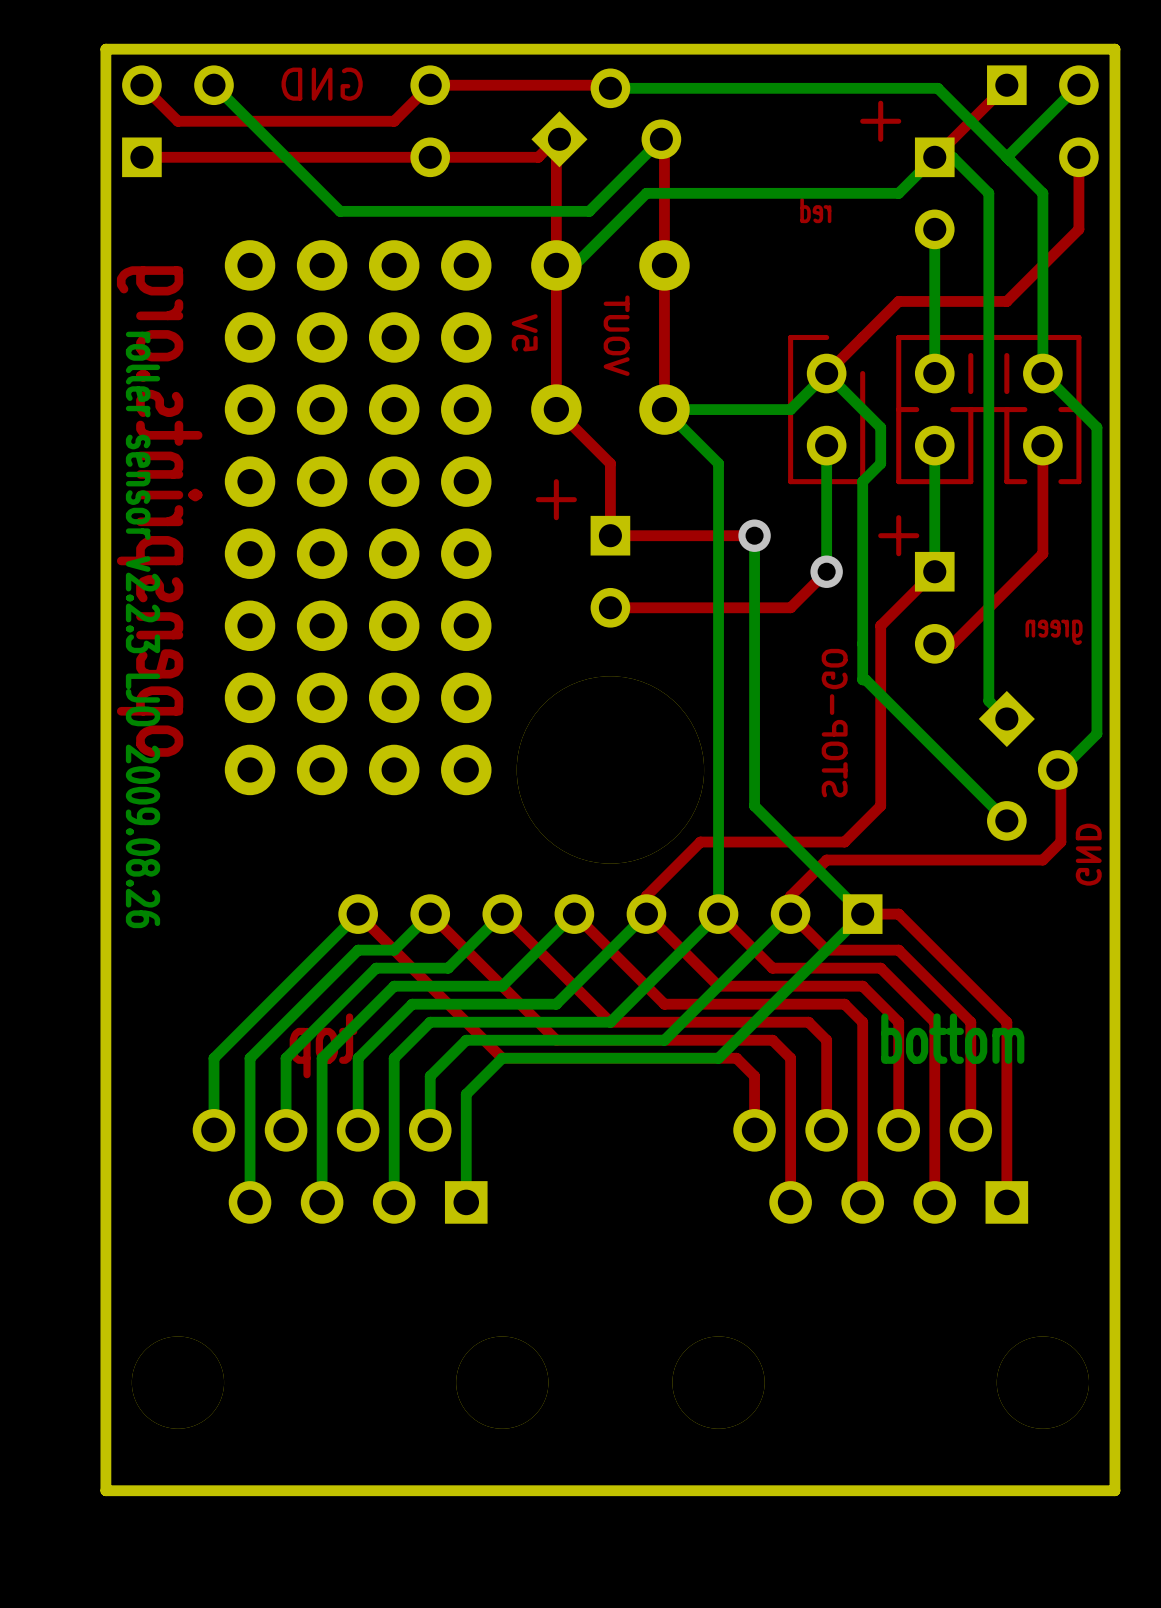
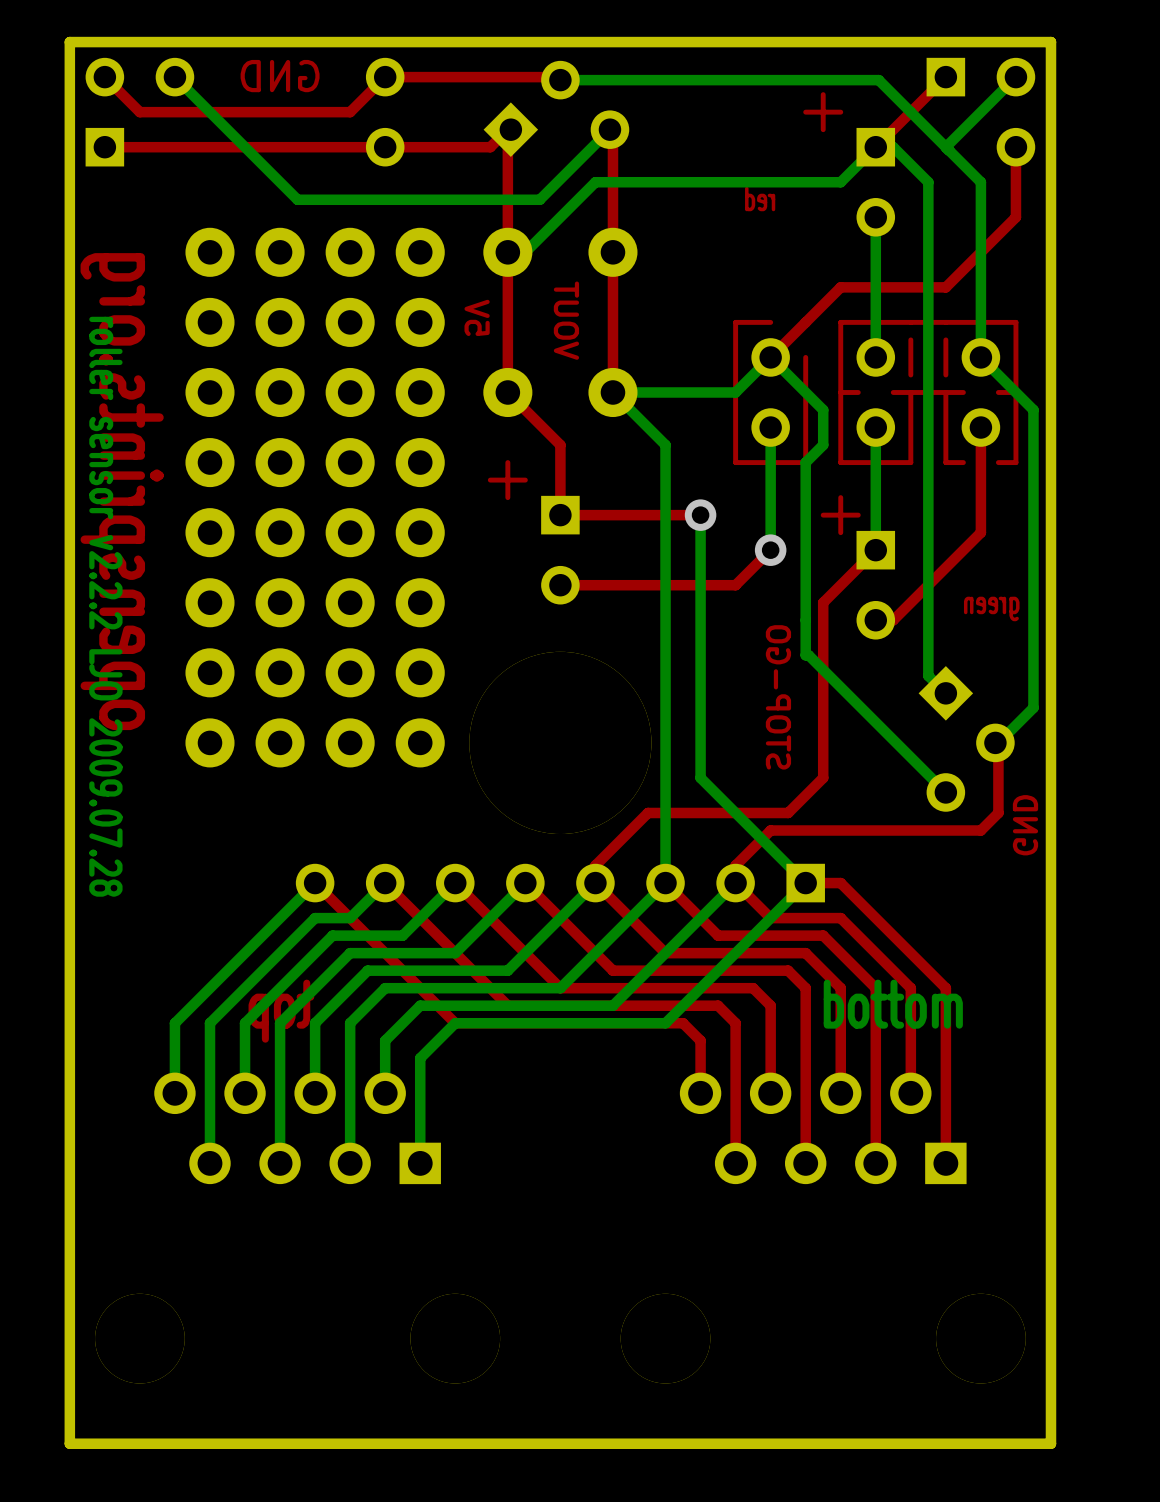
text: roller sensor v2.2.3 LJO 2009.08.26 (142, 629) -> roller sensor v2.2.2 LJO 2009.07.28 (105, 606)

